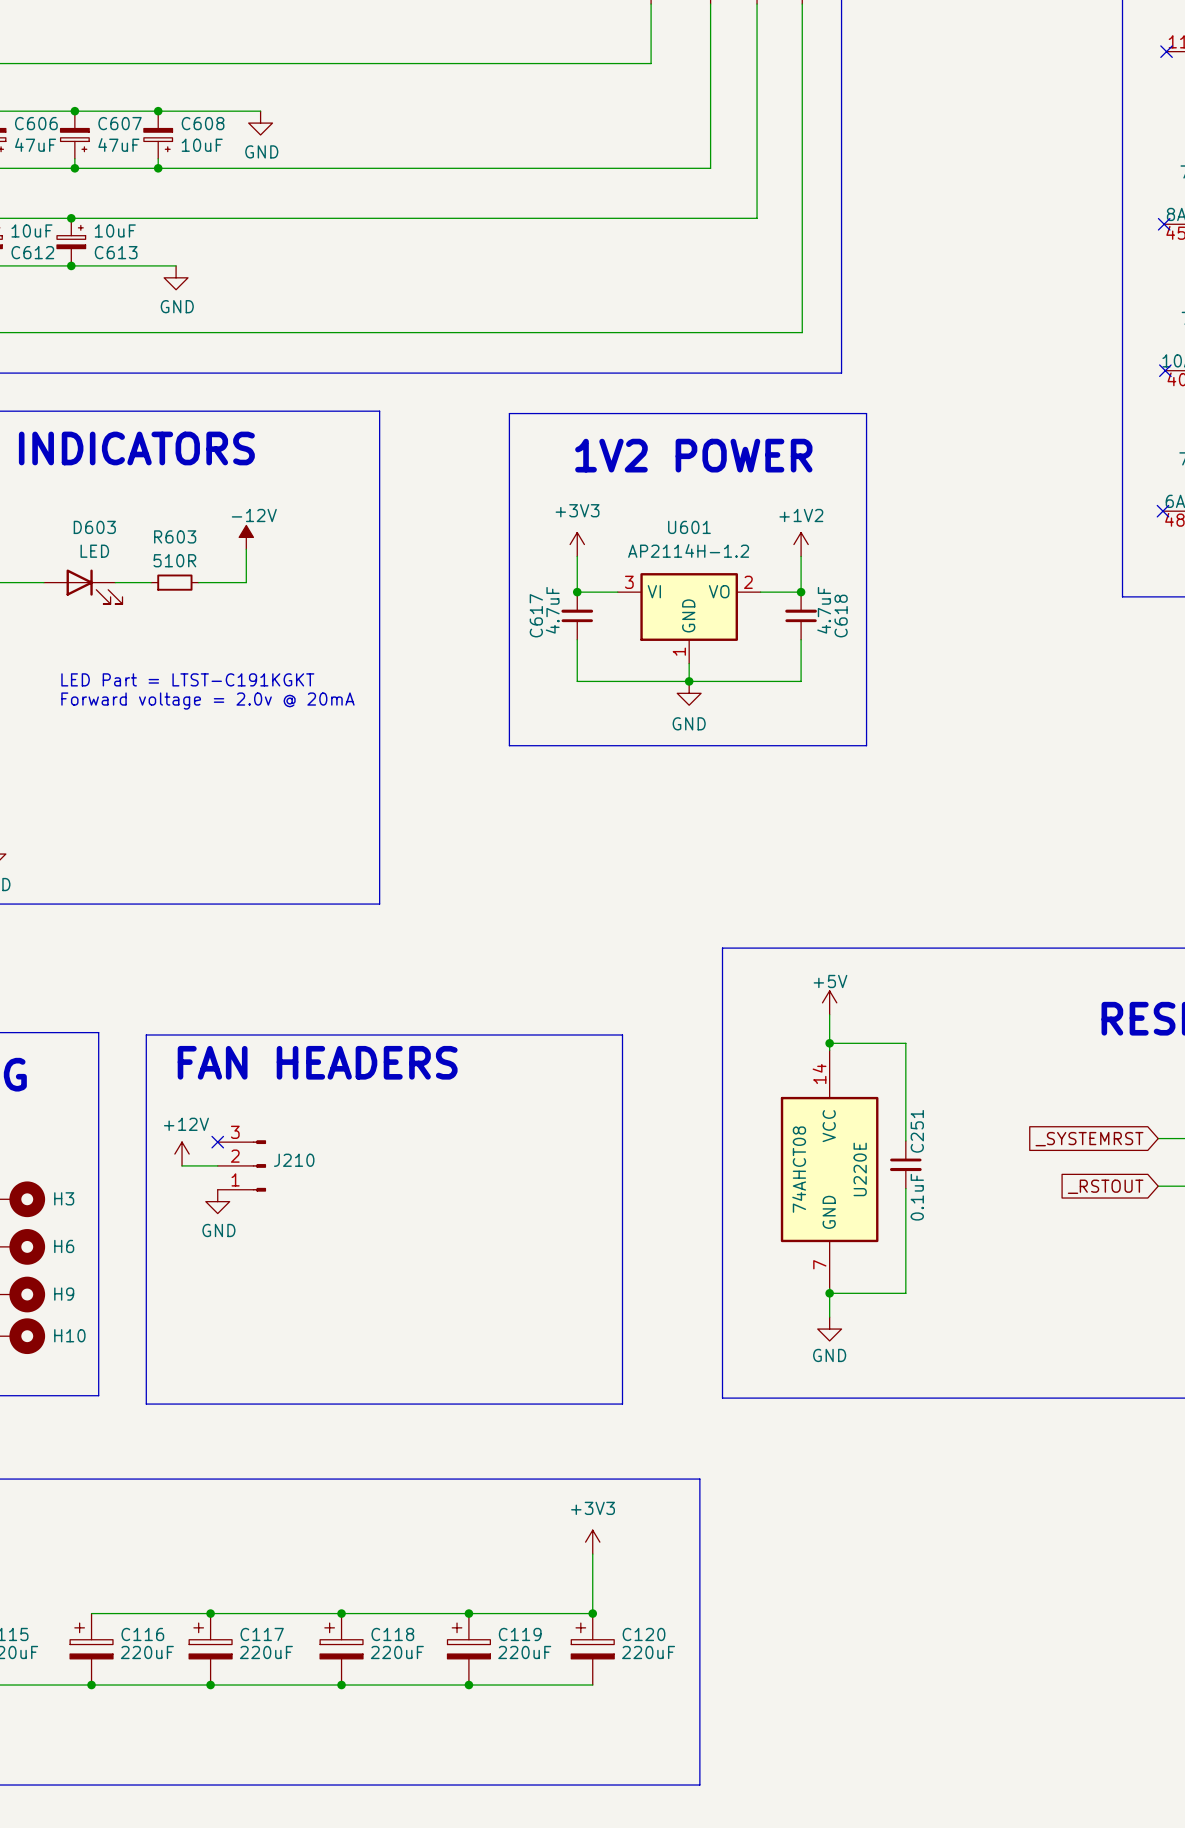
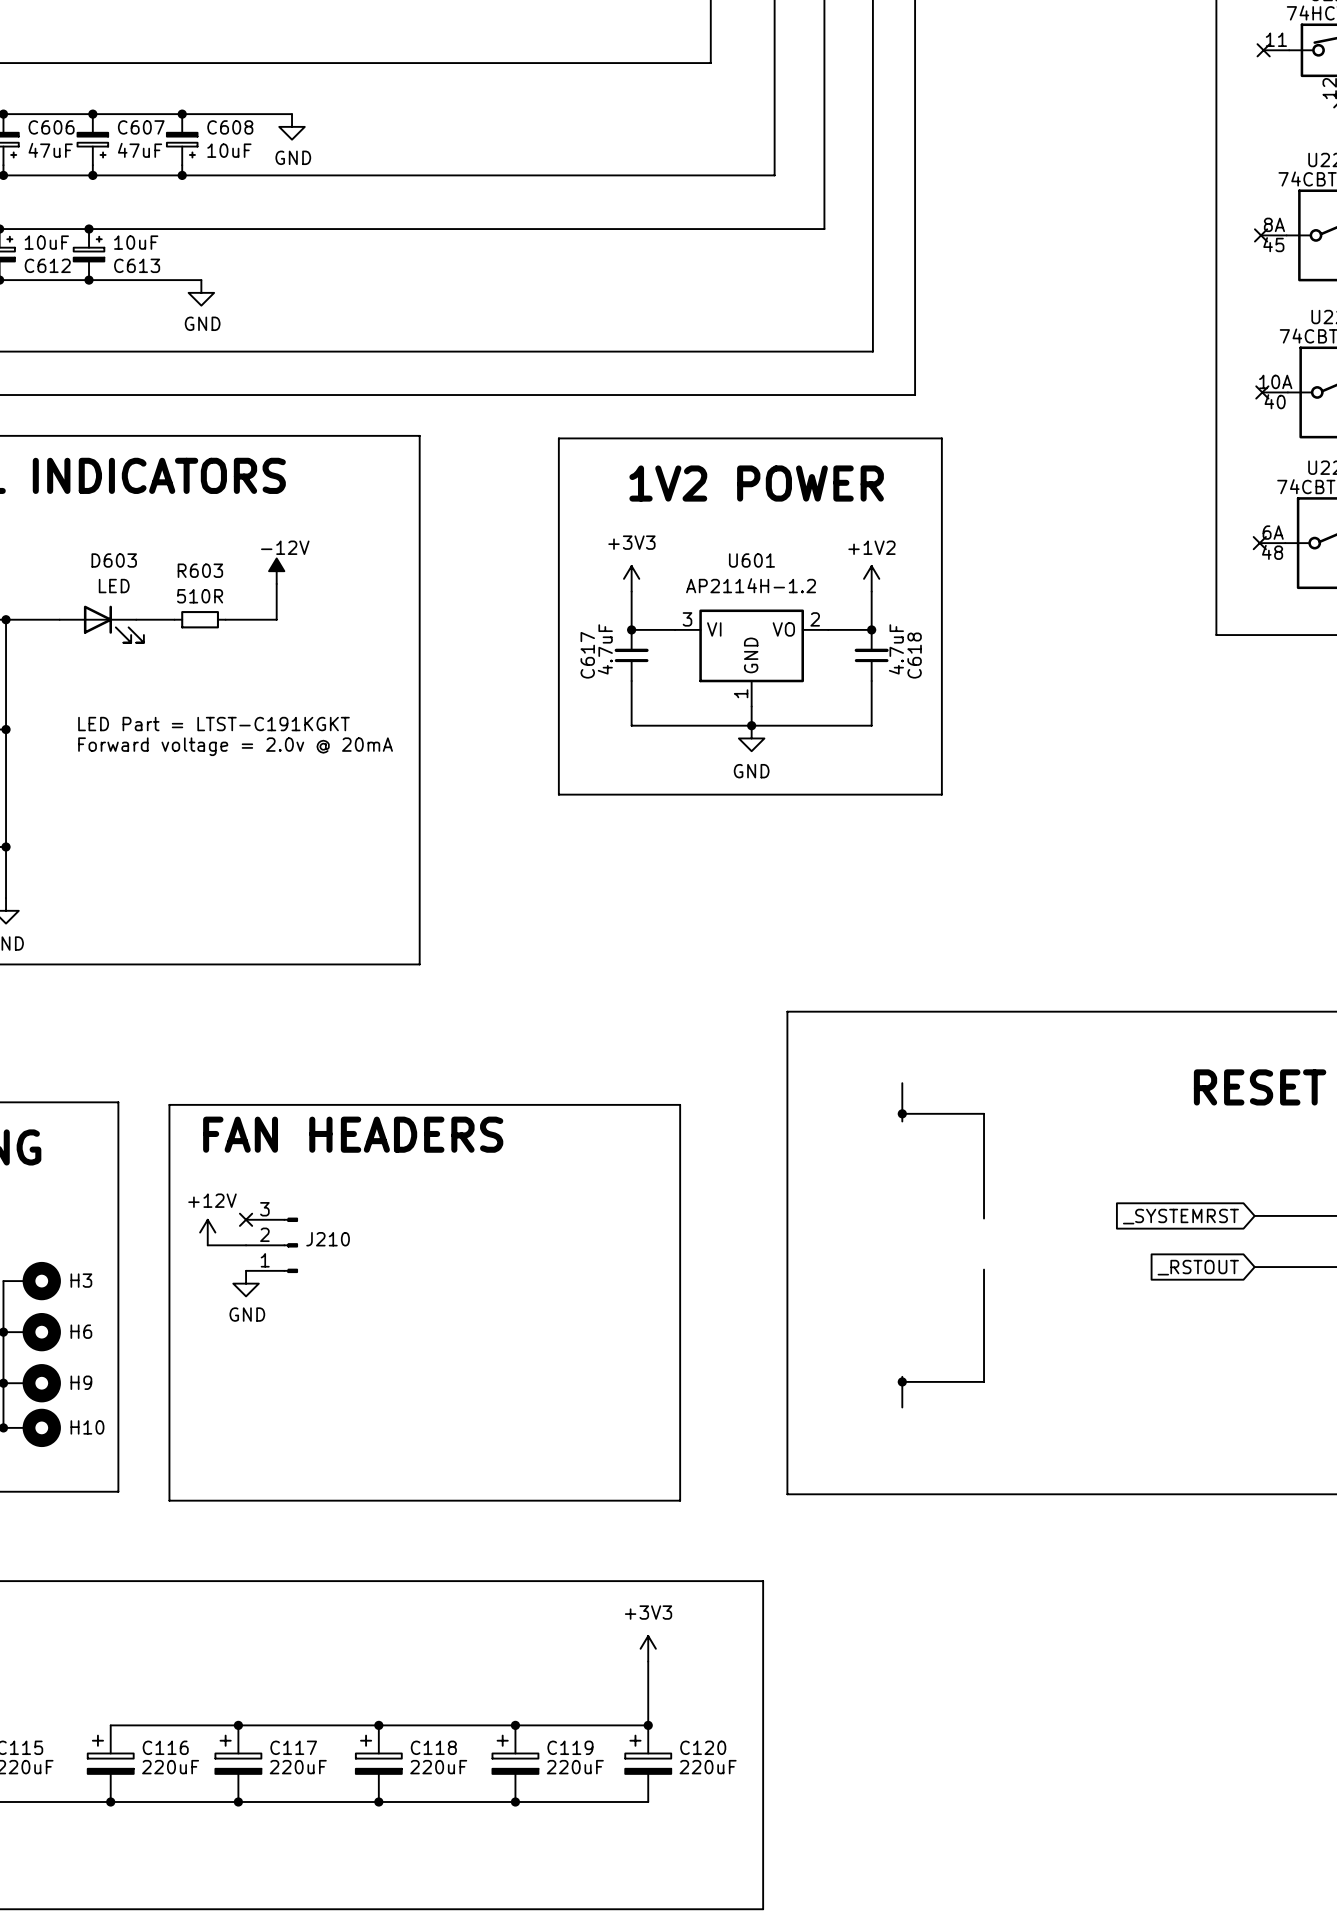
power symbol: +5V (829, 1002) -> none
C251: 0.1uF (905, 1164) -> none
U220E: 74AHCT08 (829, 1169) -> none
power symbol: GND (829, 1329) -> none

